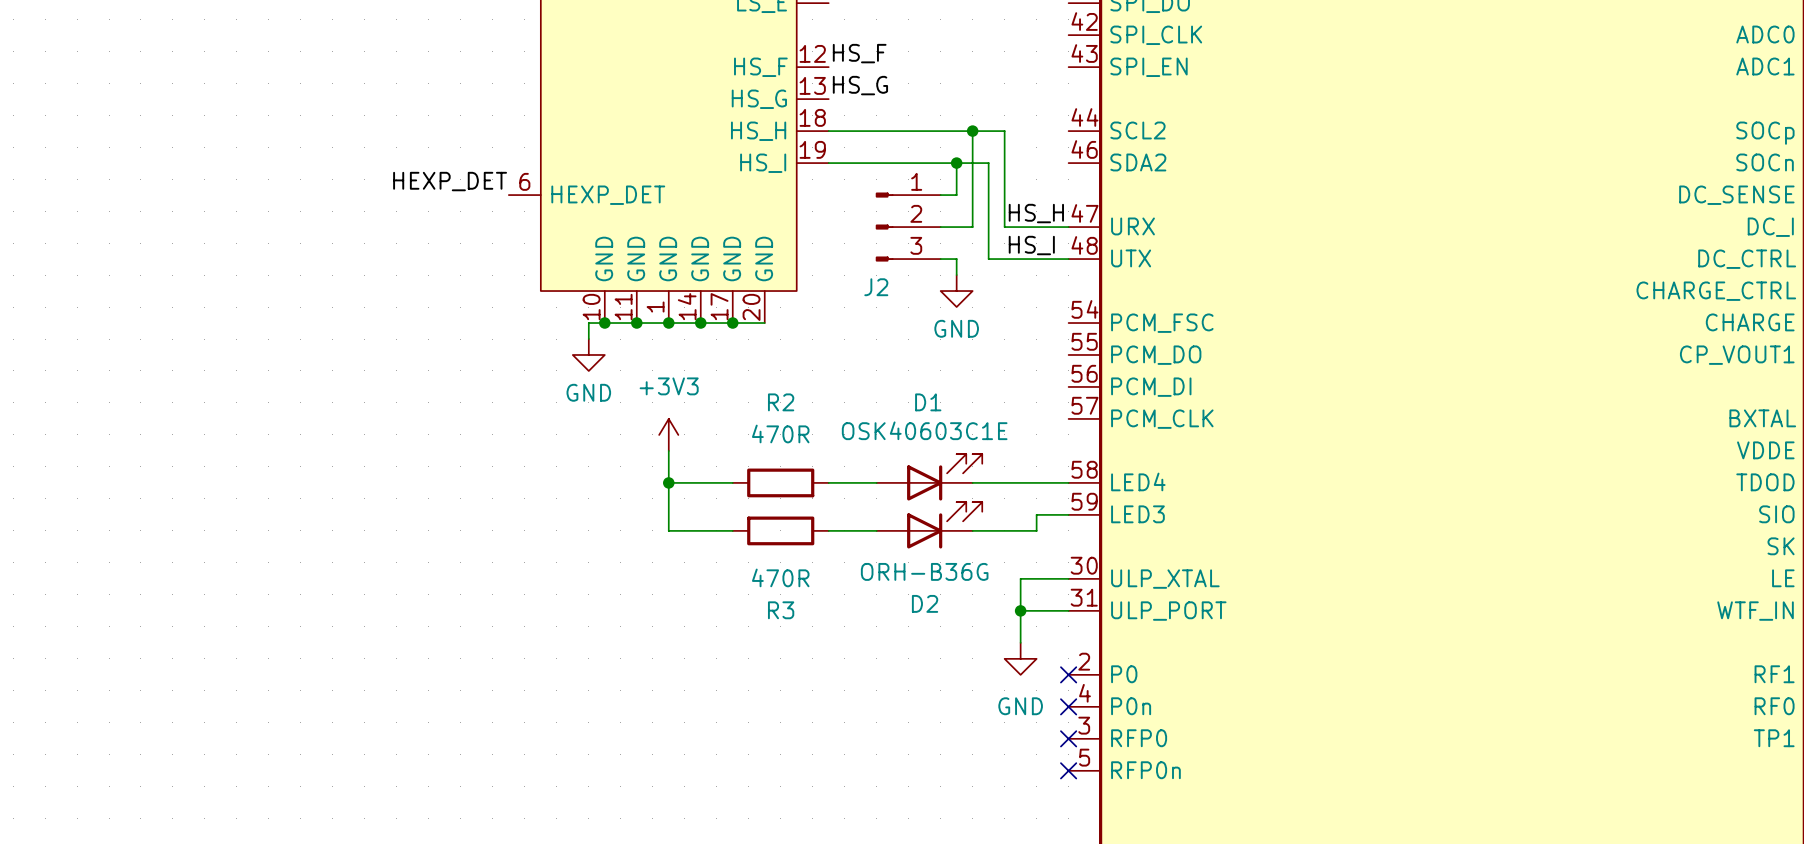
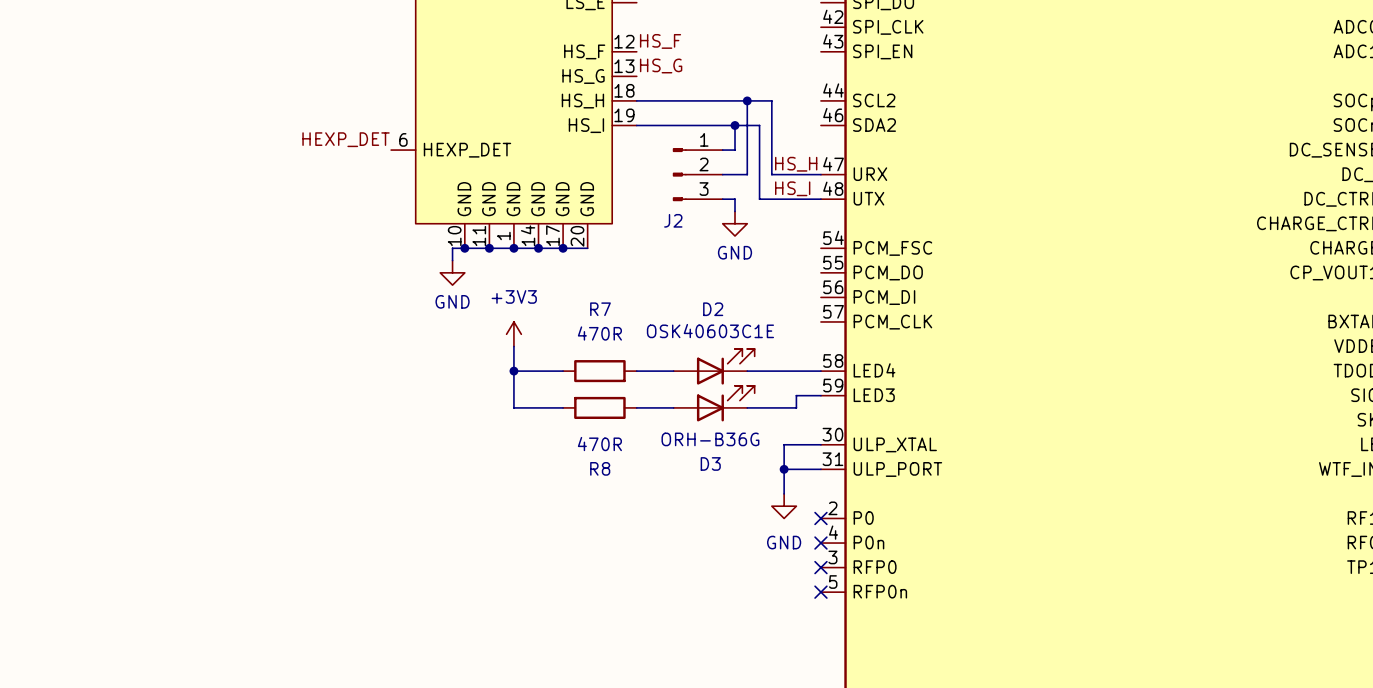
R2 name: R2 (781, 402) -> R7 (600, 309)
D1 name: D1 (928, 402) -> D2 (713, 309)
D2 name: D2 (925, 603) -> D3 (710, 463)
R3 name: R3 (781, 610) -> R8 (600, 468)

